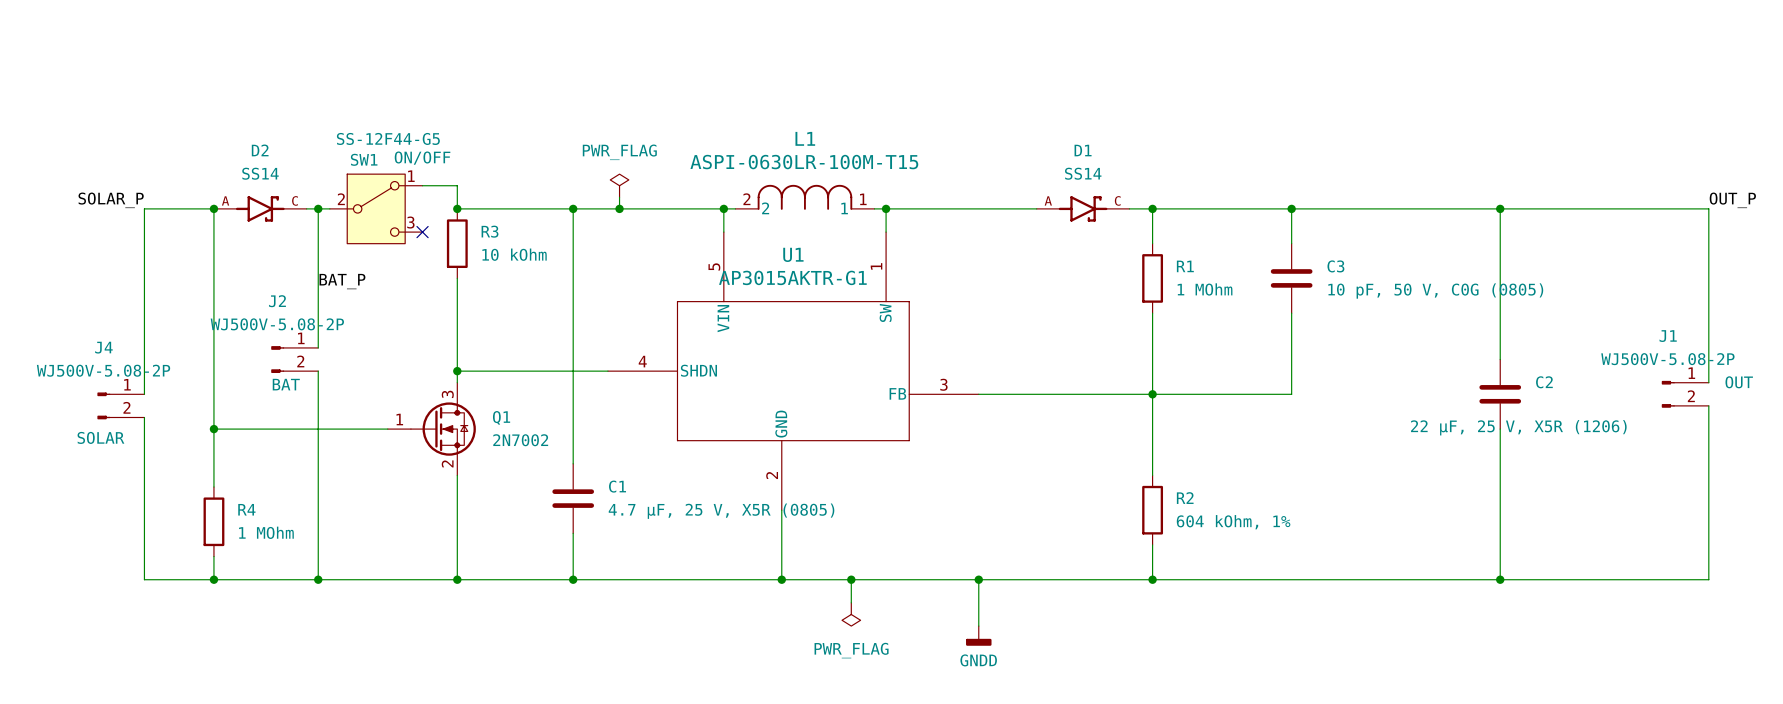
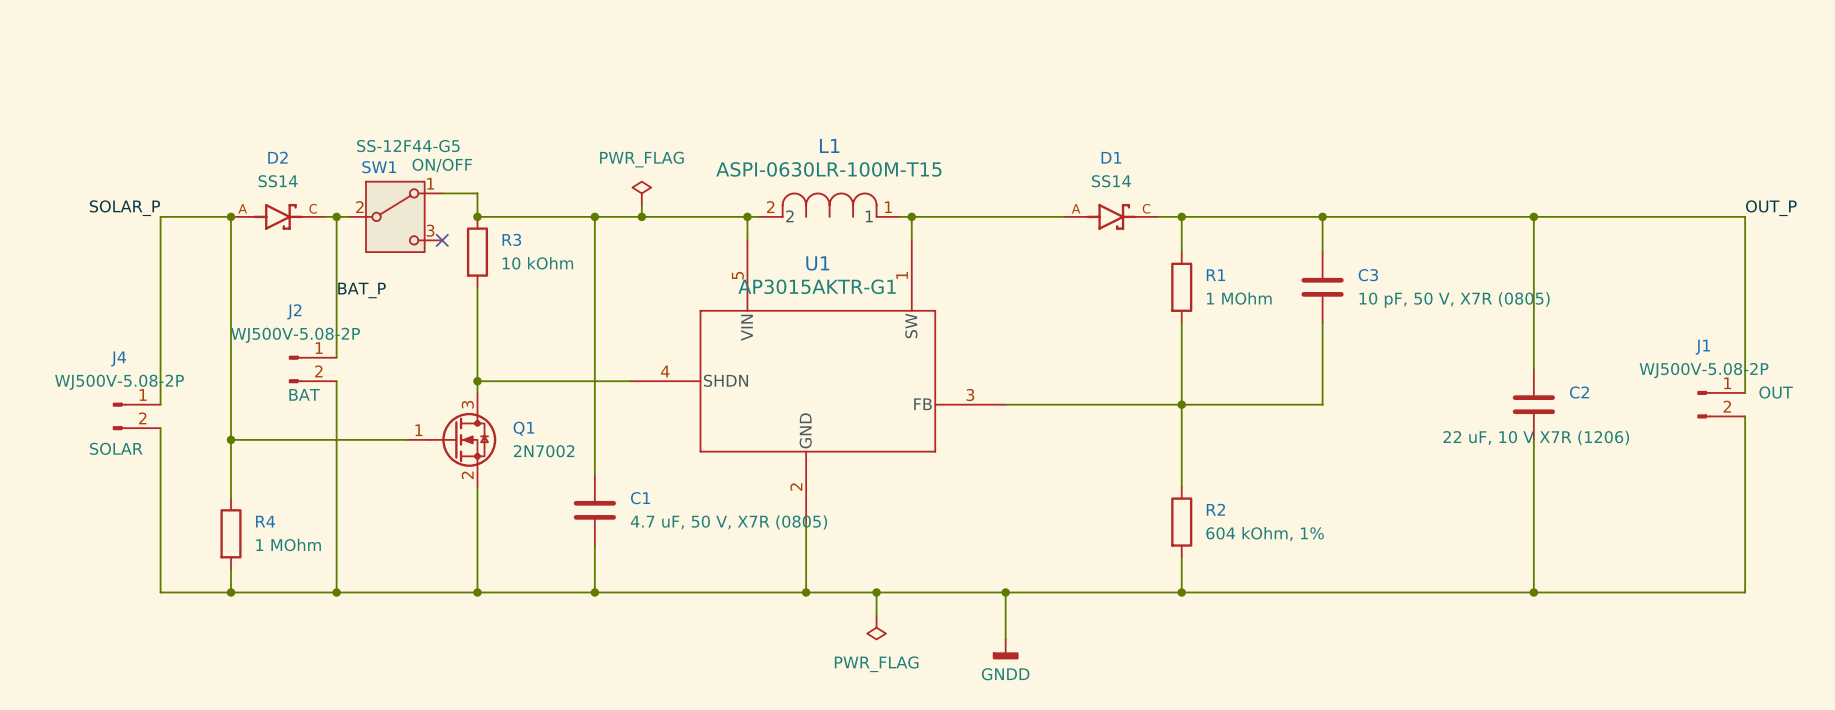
C3 value: 10 pF, 50 V, C0G (0805) (1435, 291) -> 10 pF, 50 V, X7R (0805) (1454, 300)
C2 value: 22 µF, 25 V, X5R (1206) (1518, 427) -> 22 uF, 10 V X7R (1206) (1536, 437)
C1 value: 4.7 µF, 25 V, X5R (0805) (721, 511) -> 4.7 uF, 50 V, X7R (0805) (728, 522)

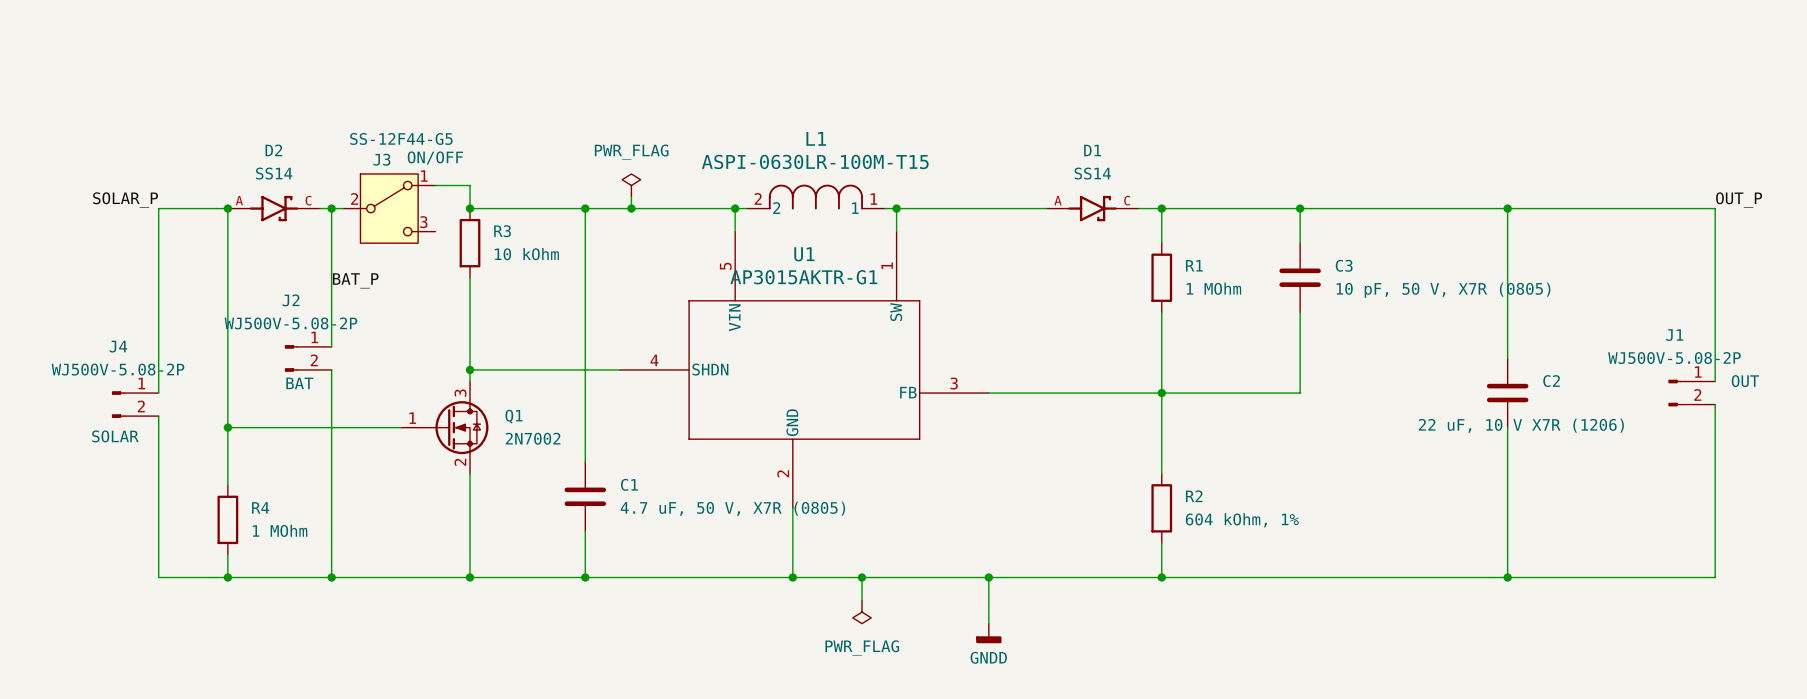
SW1 name: SW1 (379, 167) -> J3 (381, 159)
no-connect mark: (442, 240) -> none

